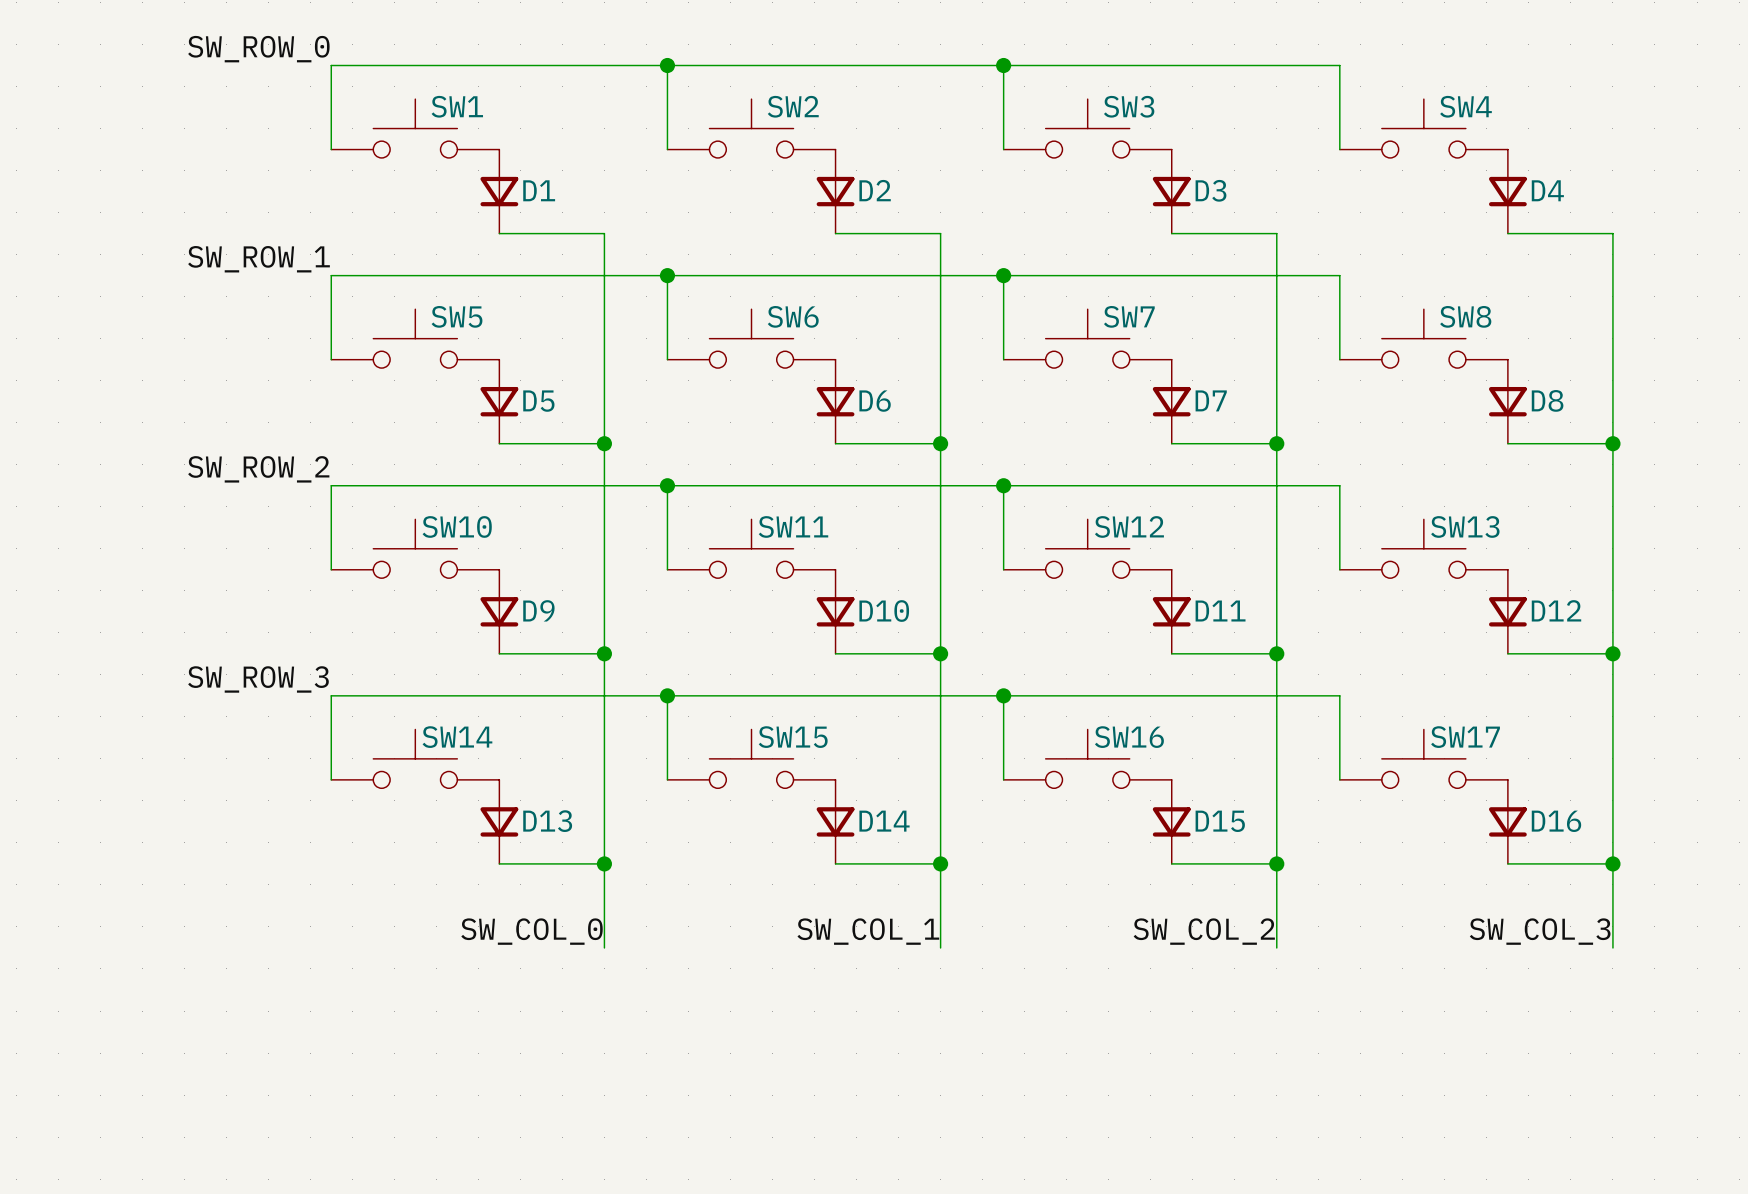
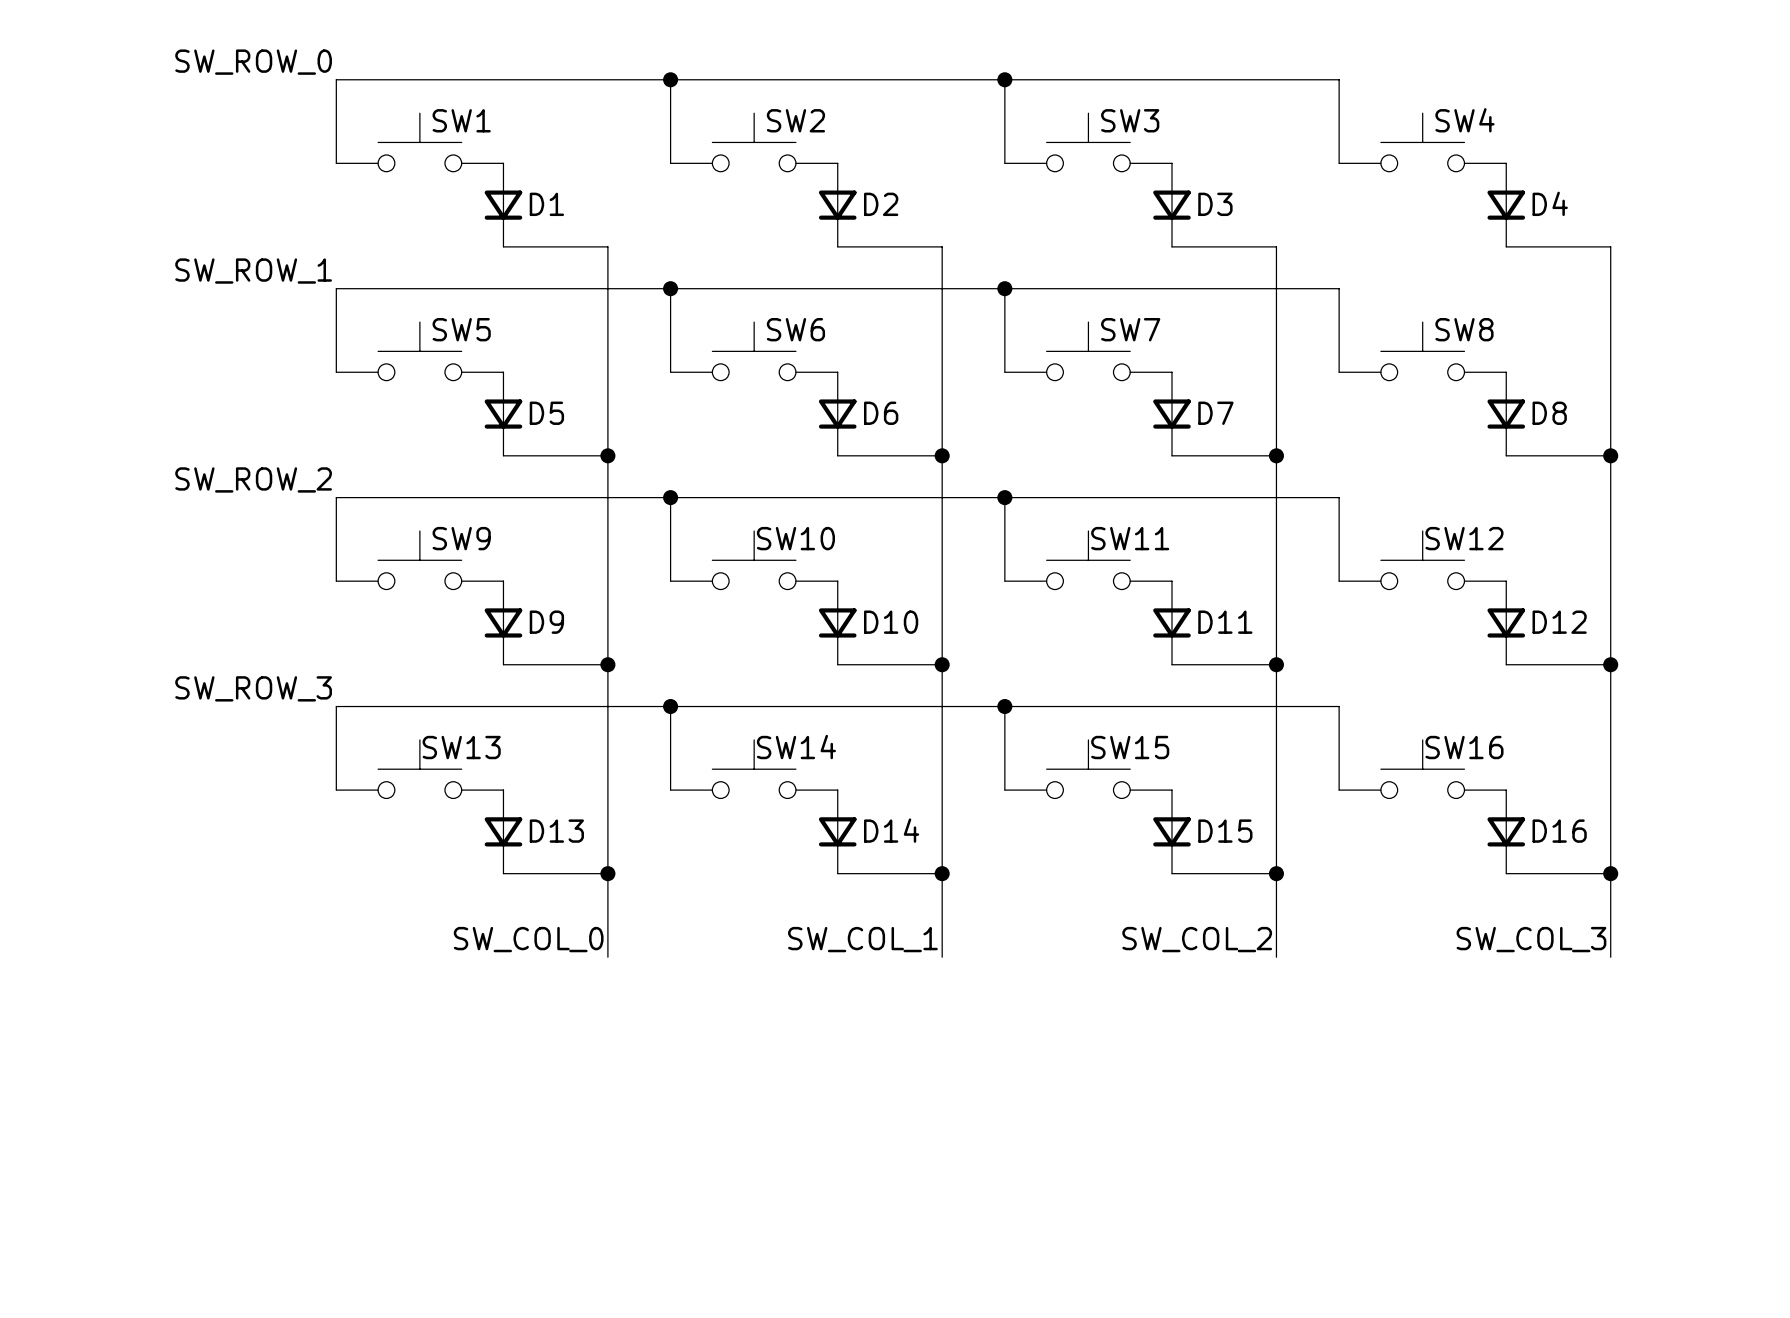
SW10 name: SW10 (457, 526) -> SW9 (461, 538)
SW11 name: SW11 (793, 526) -> SW10 (795, 538)
SW12 name: SW12 (1129, 526) -> SW11 (1130, 538)
SW13 name: SW13 (1465, 526) -> SW12 (1464, 538)
SW14 name: SW14 (457, 737) -> SW13 (461, 747)
SW15 name: SW15 (793, 737) -> SW14 (796, 747)
SW16 name: SW16 (1129, 737) -> SW15 (1130, 747)
SW17 name: SW17 (1465, 737) -> SW16 (1464, 747)

